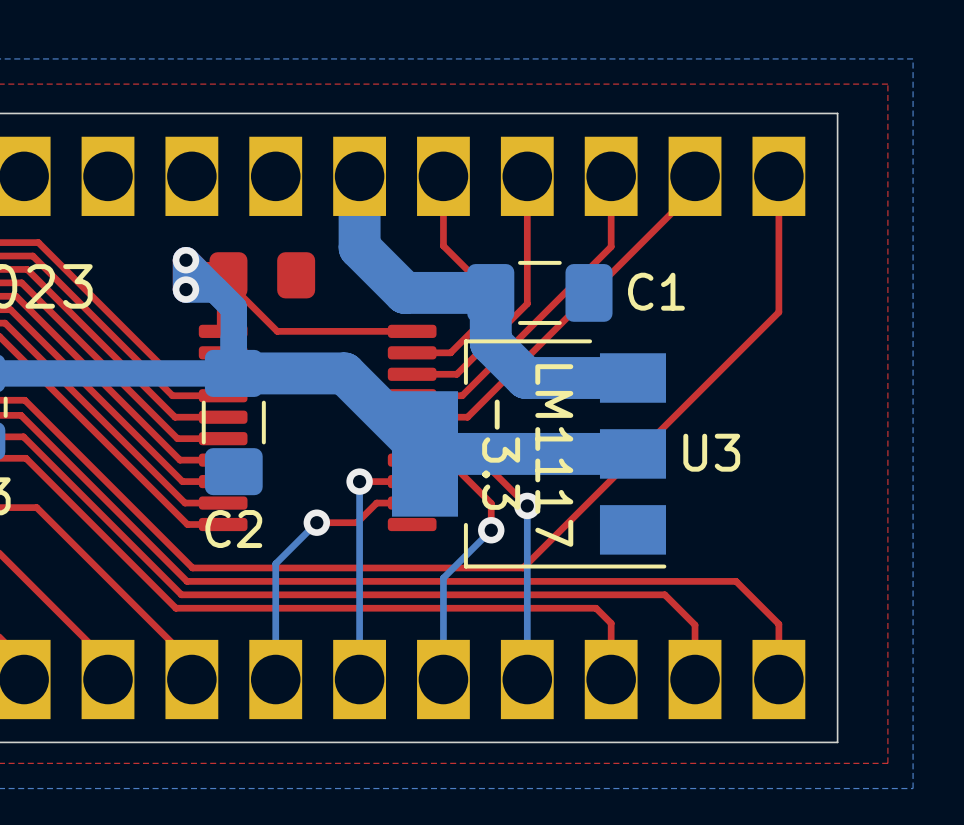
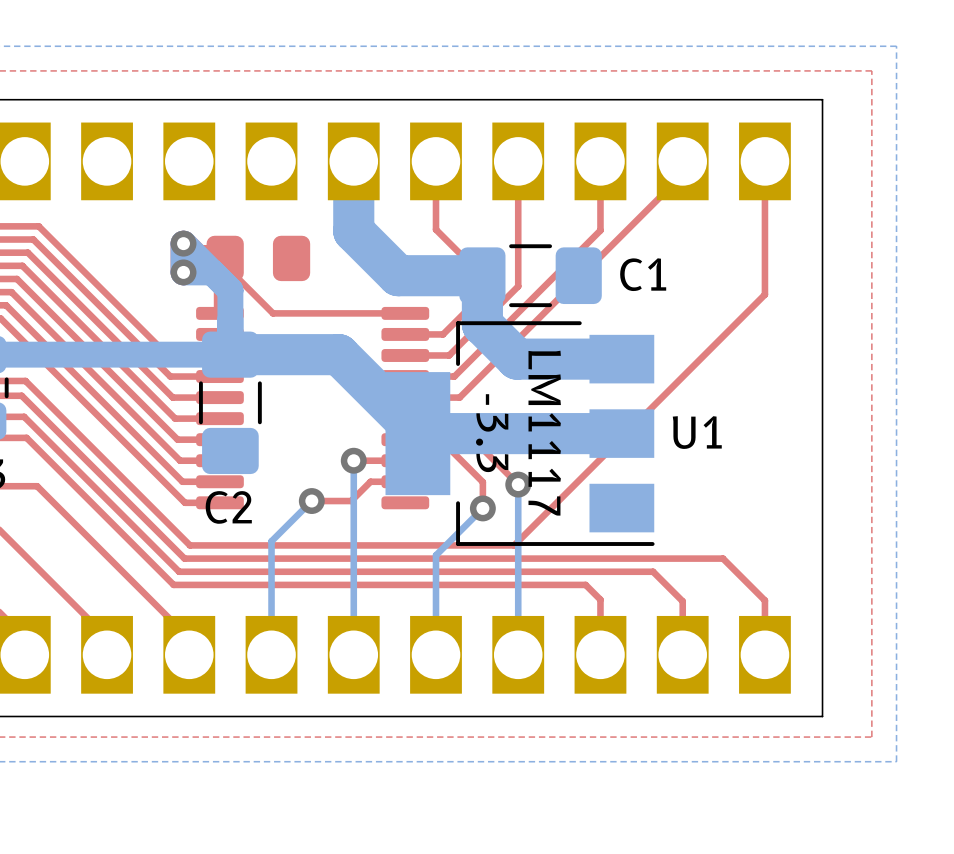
U3 name: U3 (711, 452) -> U1 (697, 432)

